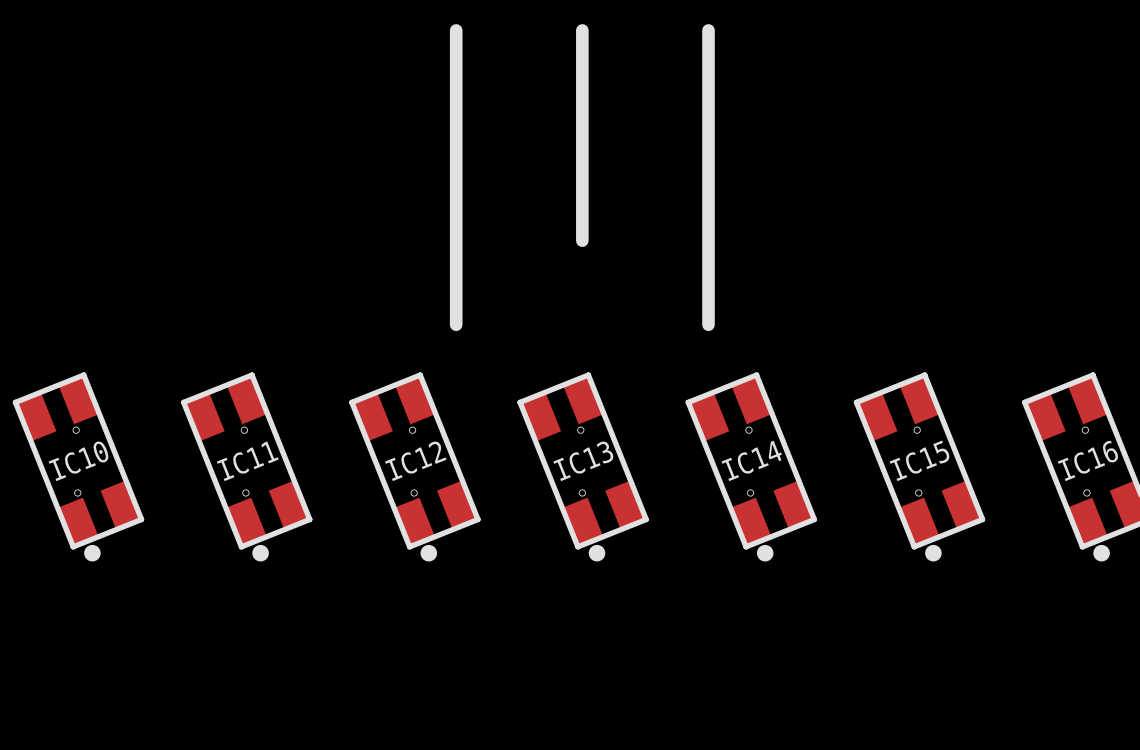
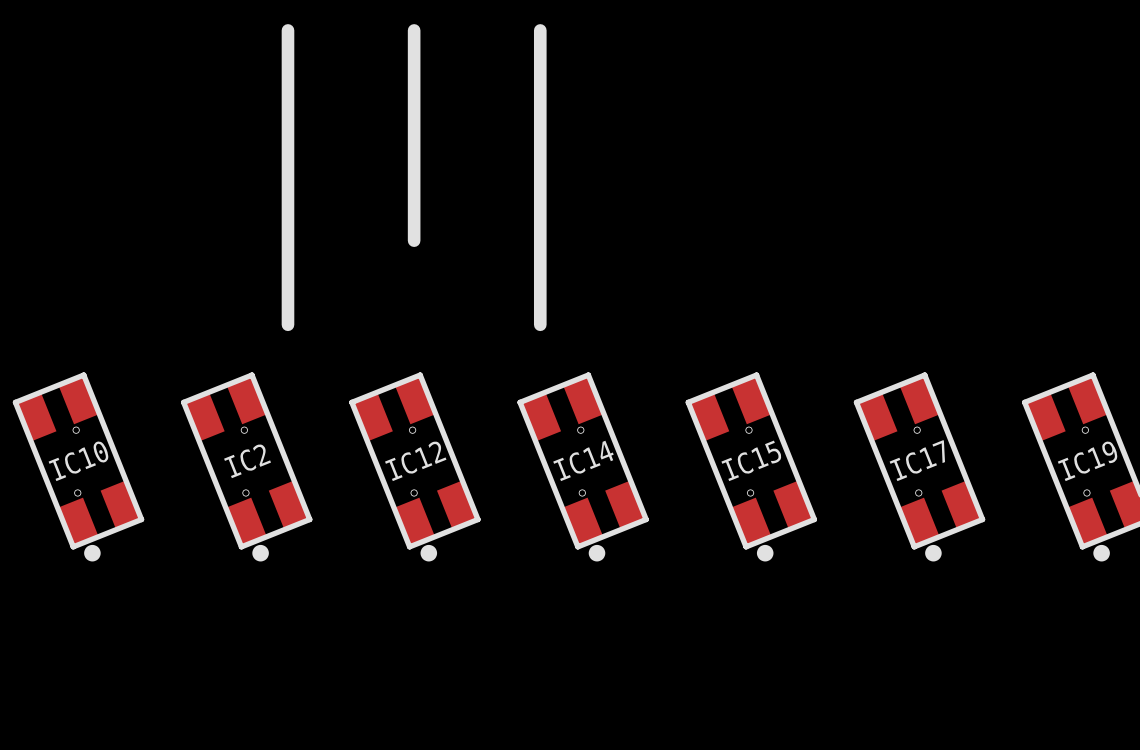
line: (456, 30) (456, 324) -> (287, 30) (287, 324)
line: (582, 30) (582, 240) -> (414, 30) (414, 240)
line: (708, 30) (708, 324) -> (540, 30) (540, 324)
IC14 name: IC14 (751, 460) -> IC15 (751, 460)
IC15 name: IC15 (919, 460) -> IC17 (917, 460)
IC16 name: IC16 (1088, 460) -> IC19 (1087, 460)
IC11 name: IC11 (247, 461) -> IC2 (247, 461)
IC13 name: IC13 (583, 461) -> IC14 (583, 460)

